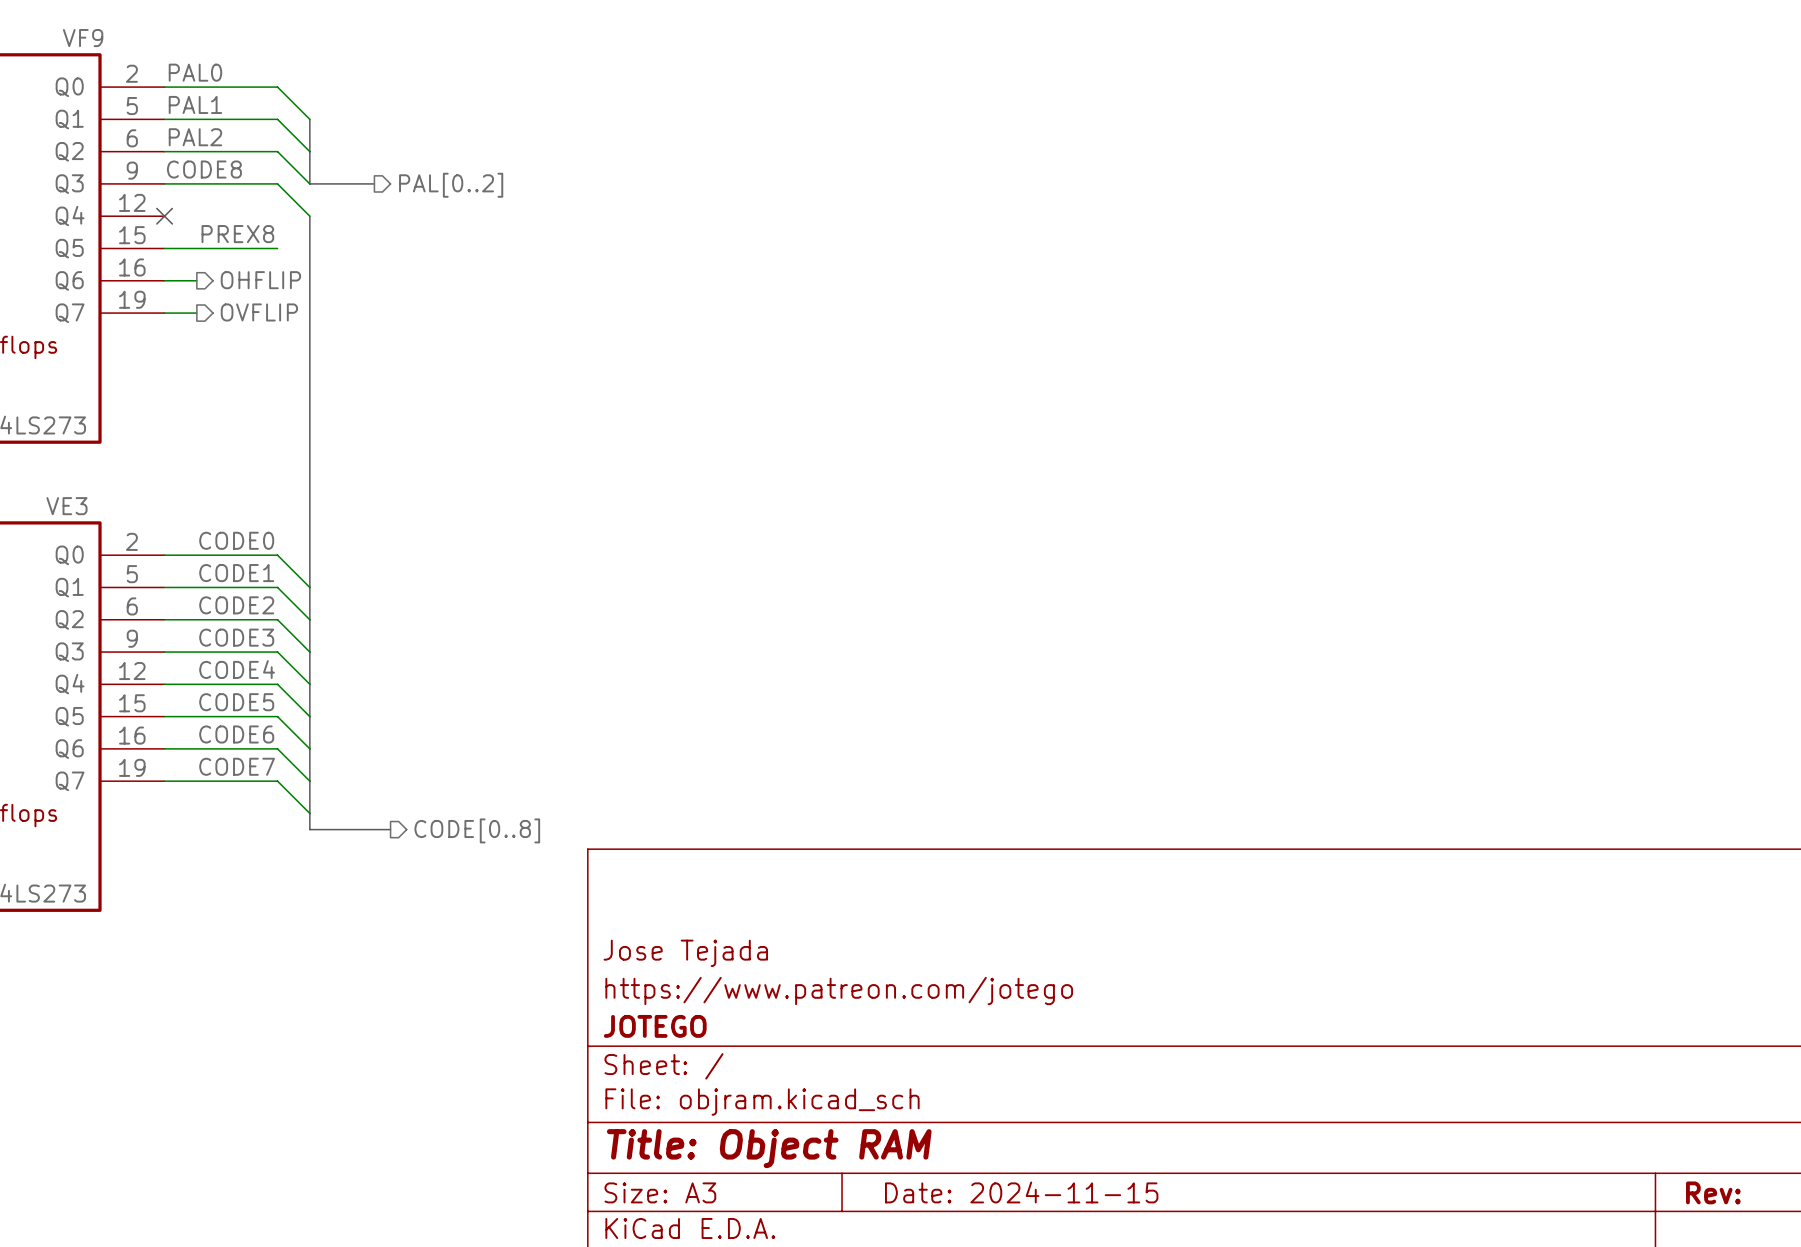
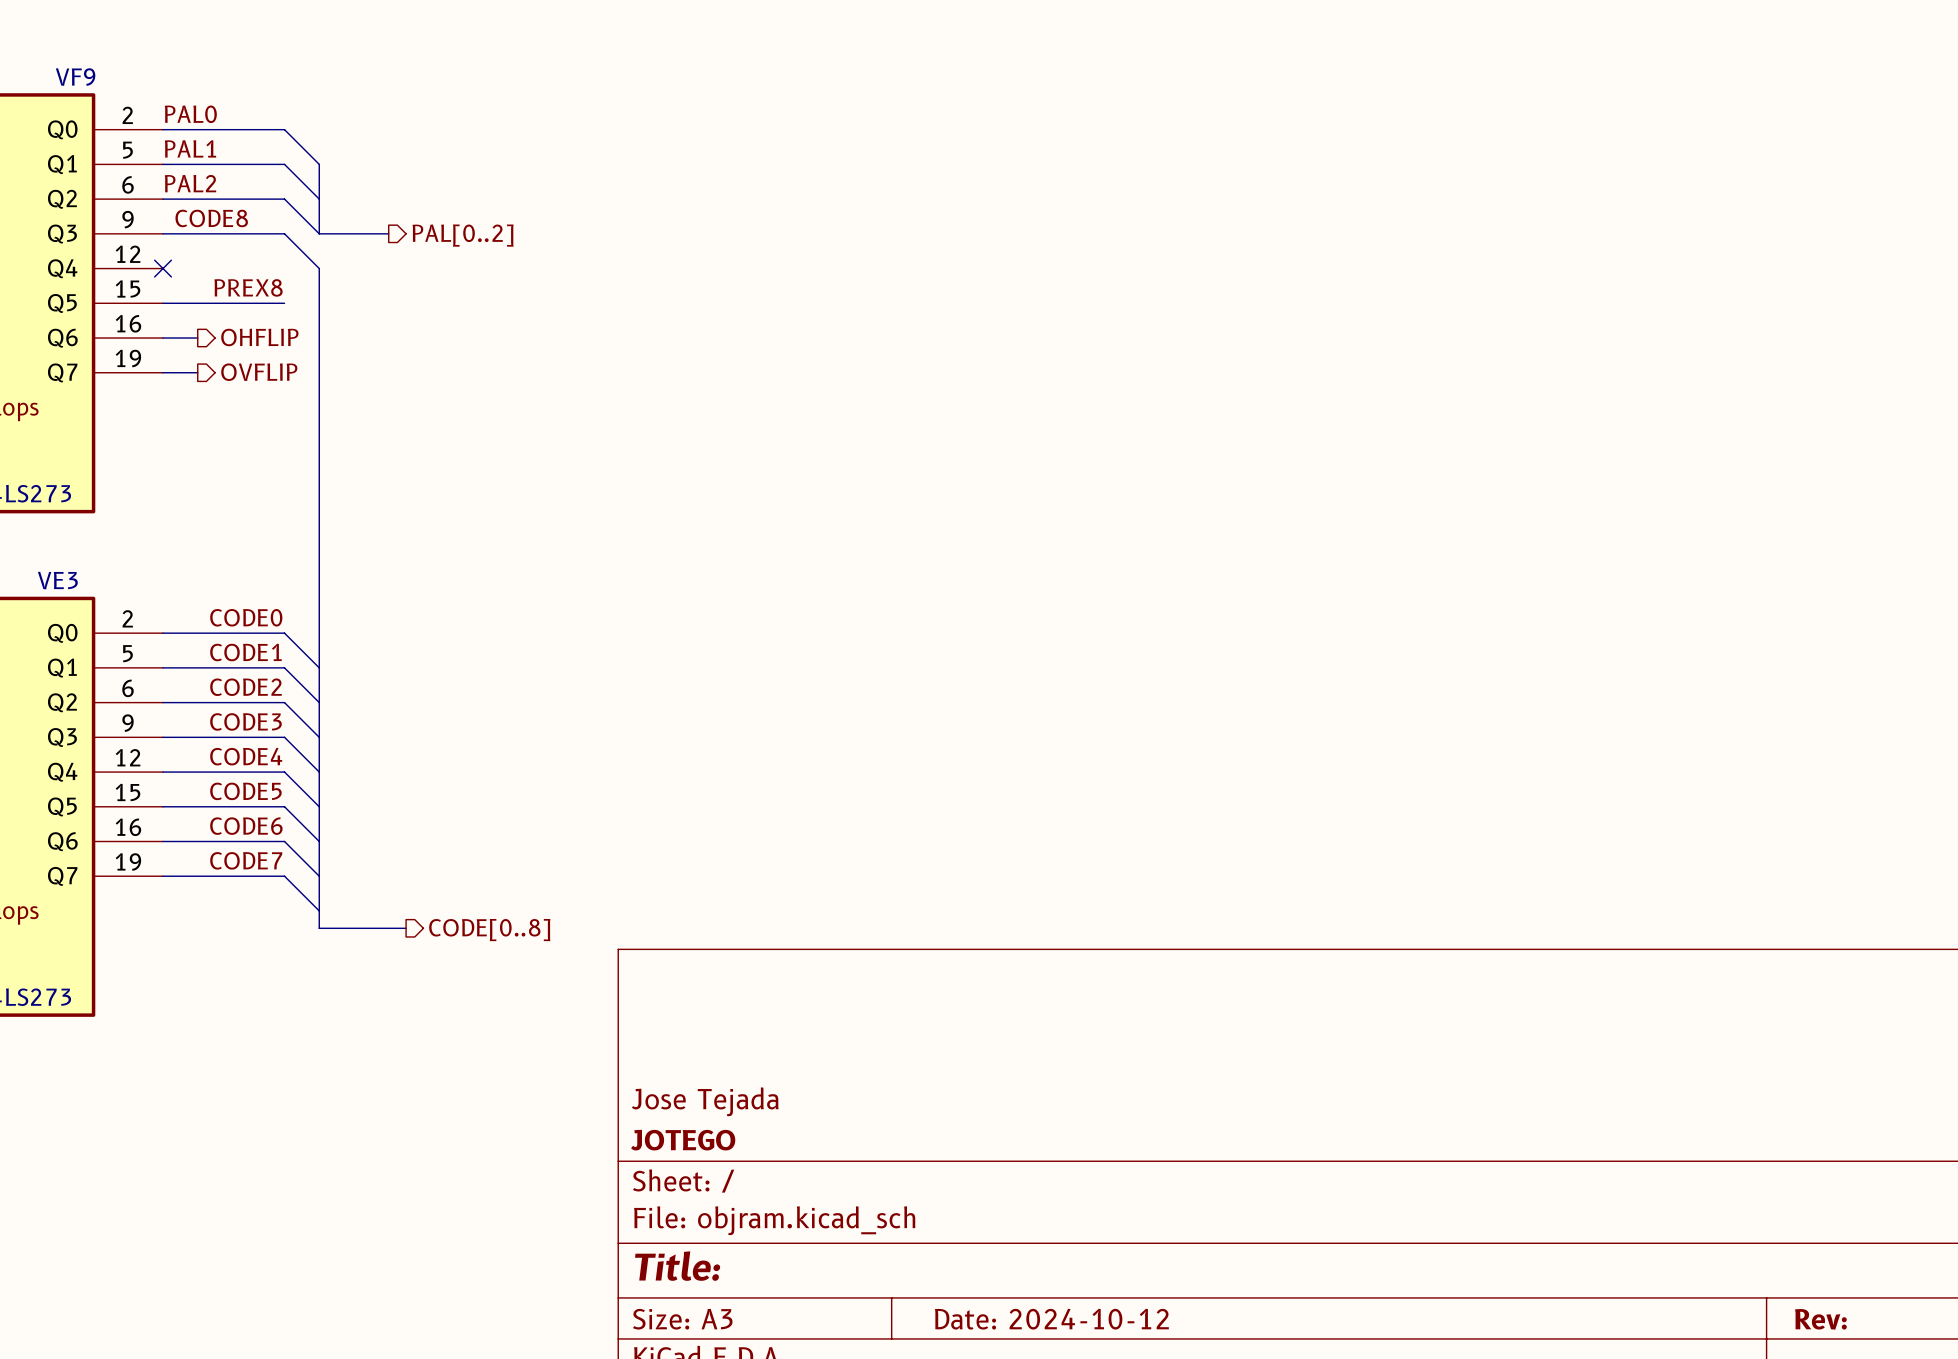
title block: Jose Tejada (685, 953) -> none
title block: https://www.patreon.com/jotego (839, 990) -> Jose Tejada (705, 1101)
title block: Title: Object RAM (769, 1148) -> Title: (677, 1266)
title block: Date: 2024-11-15 (1021, 1192) -> Date: 2024-10-12 (1051, 1319)

